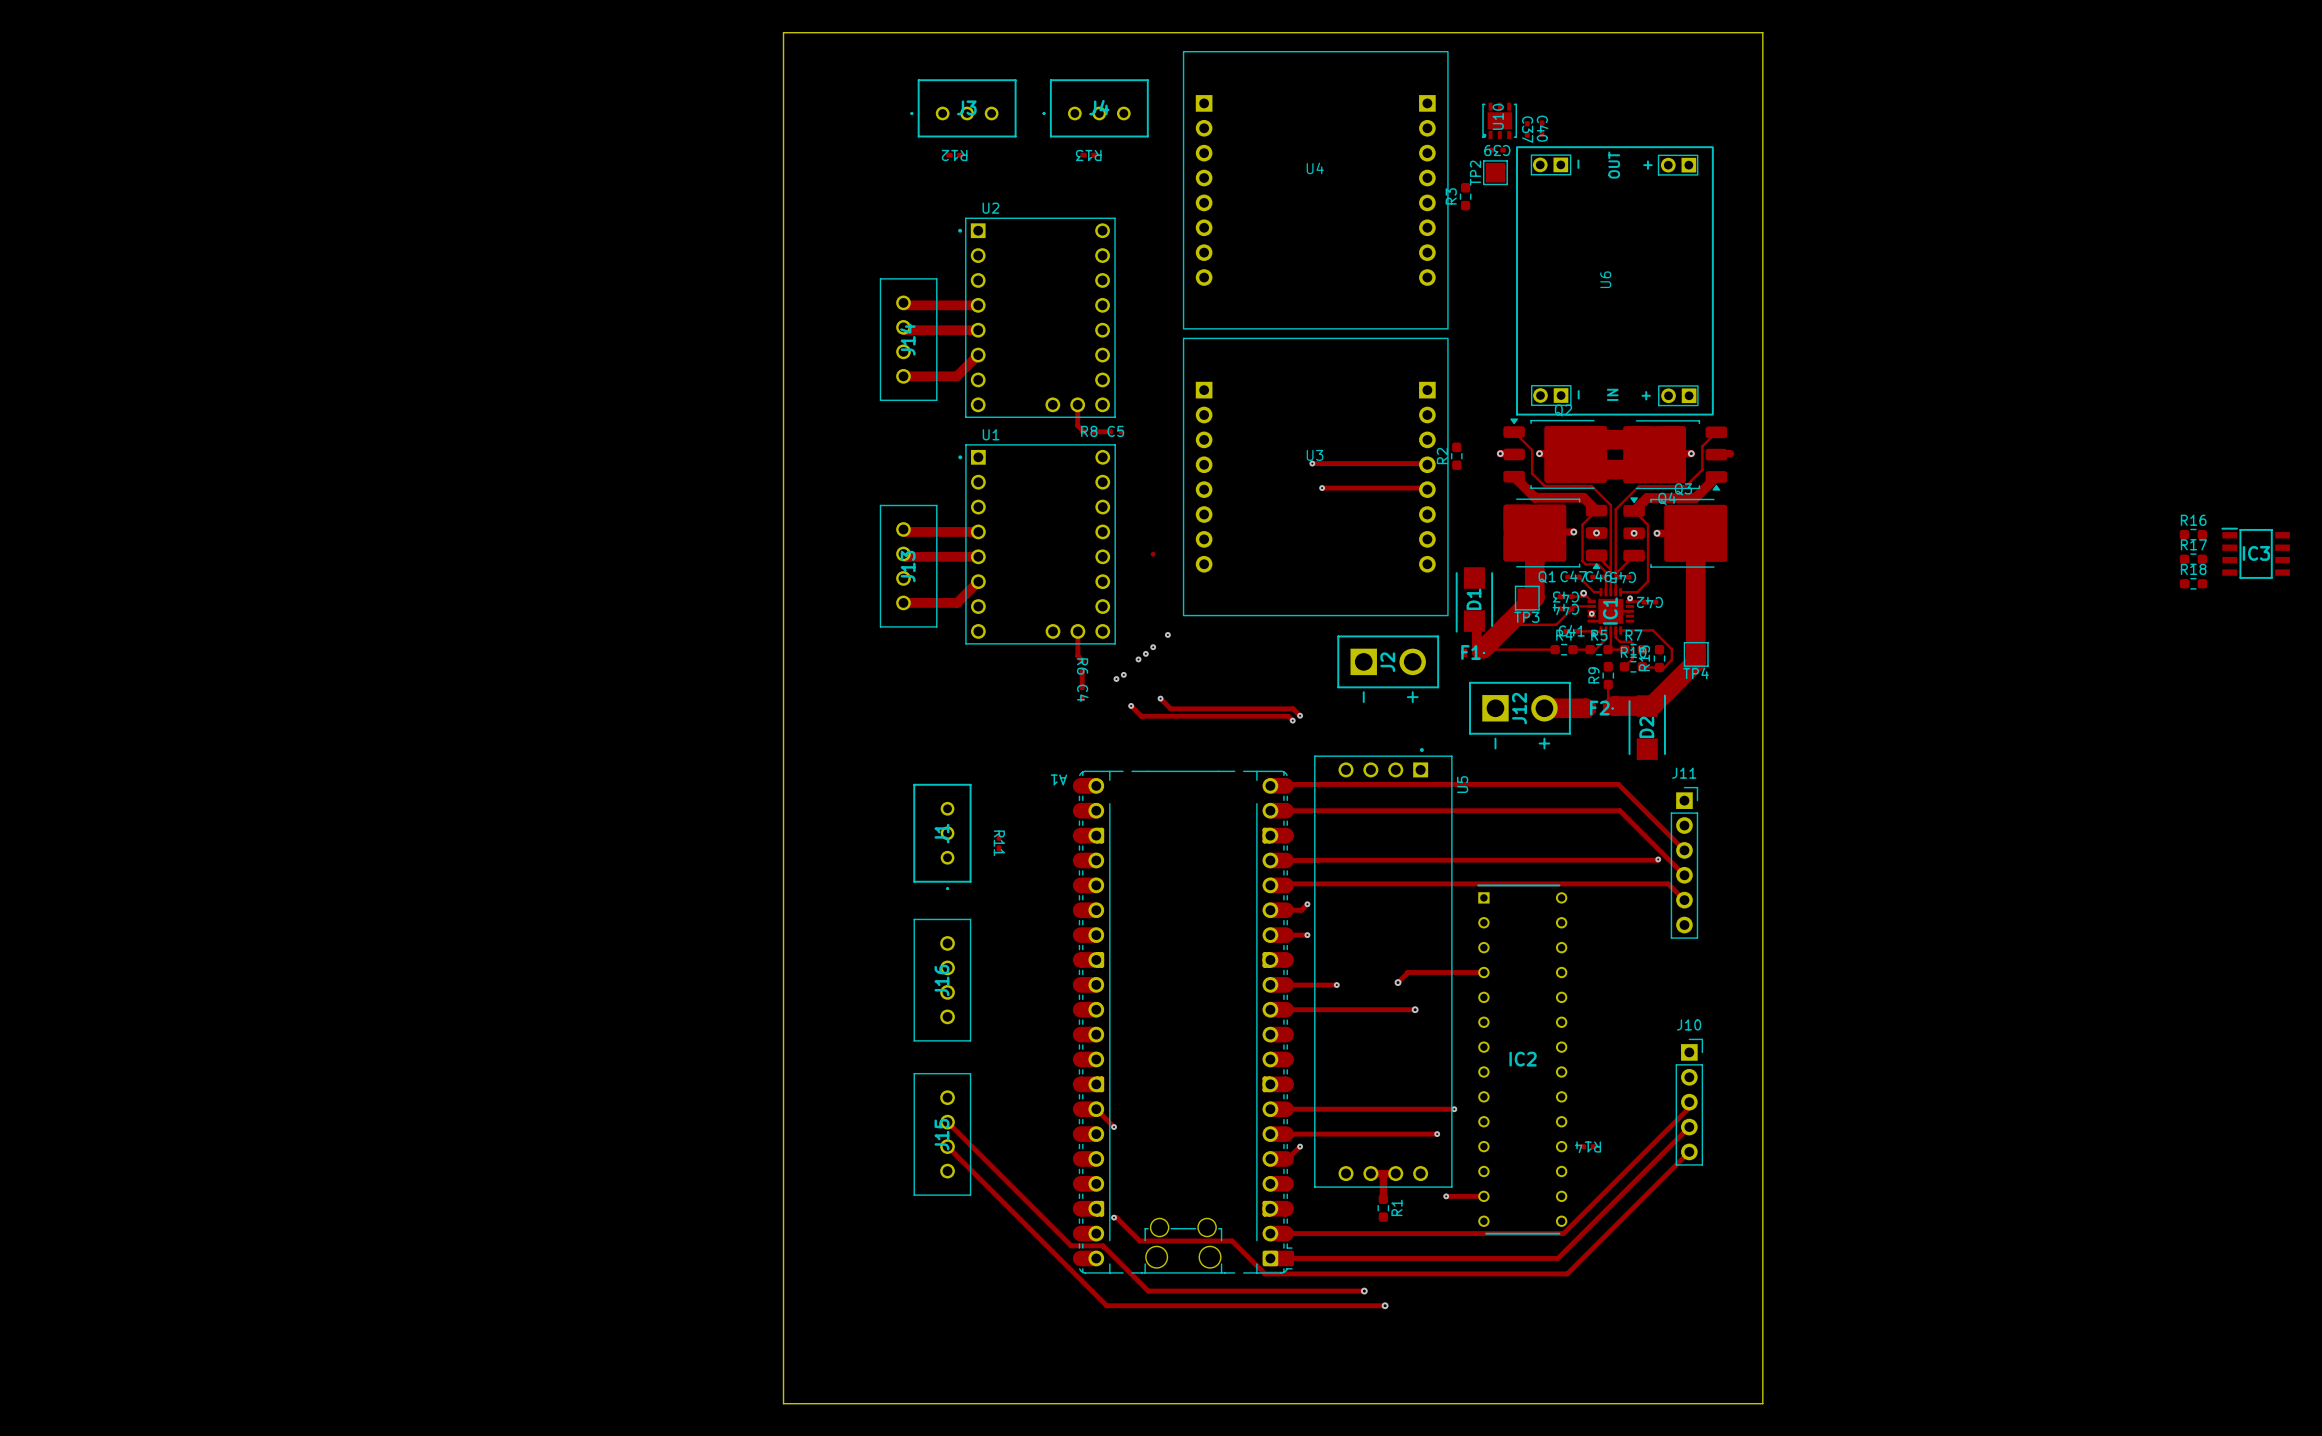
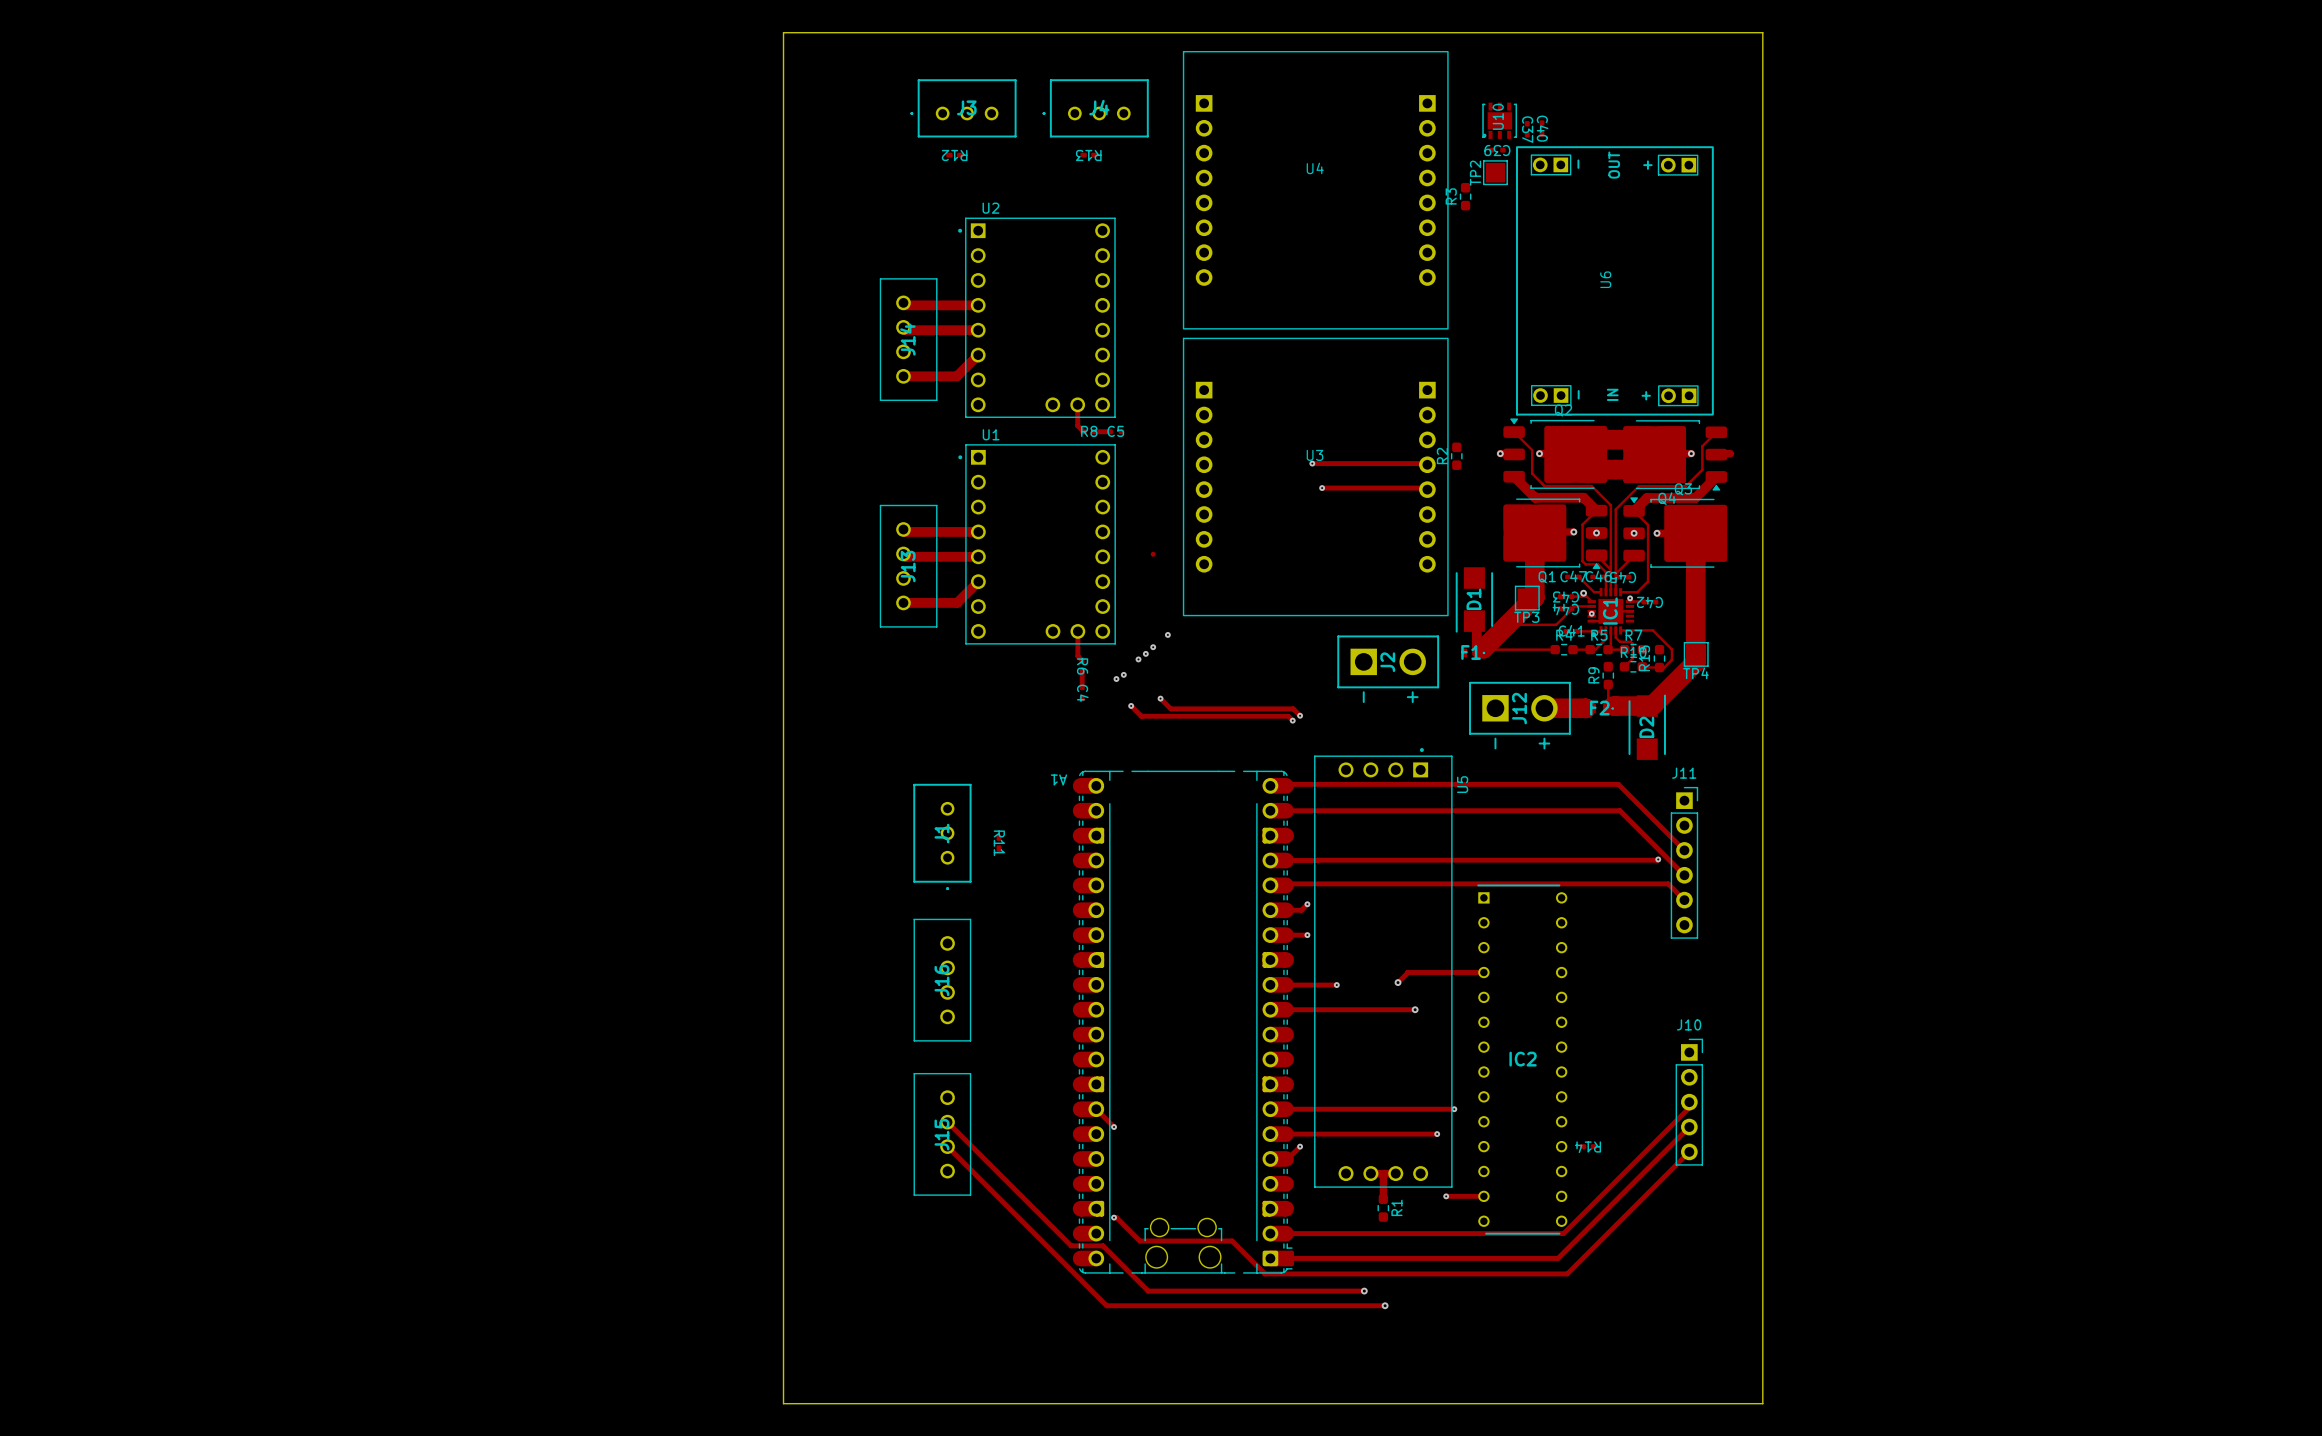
R16: (2193, 534) -> none
IC3: (2255, 553) -> none
R17: (2193, 559) -> none
R18: (2193, 583) -> none

